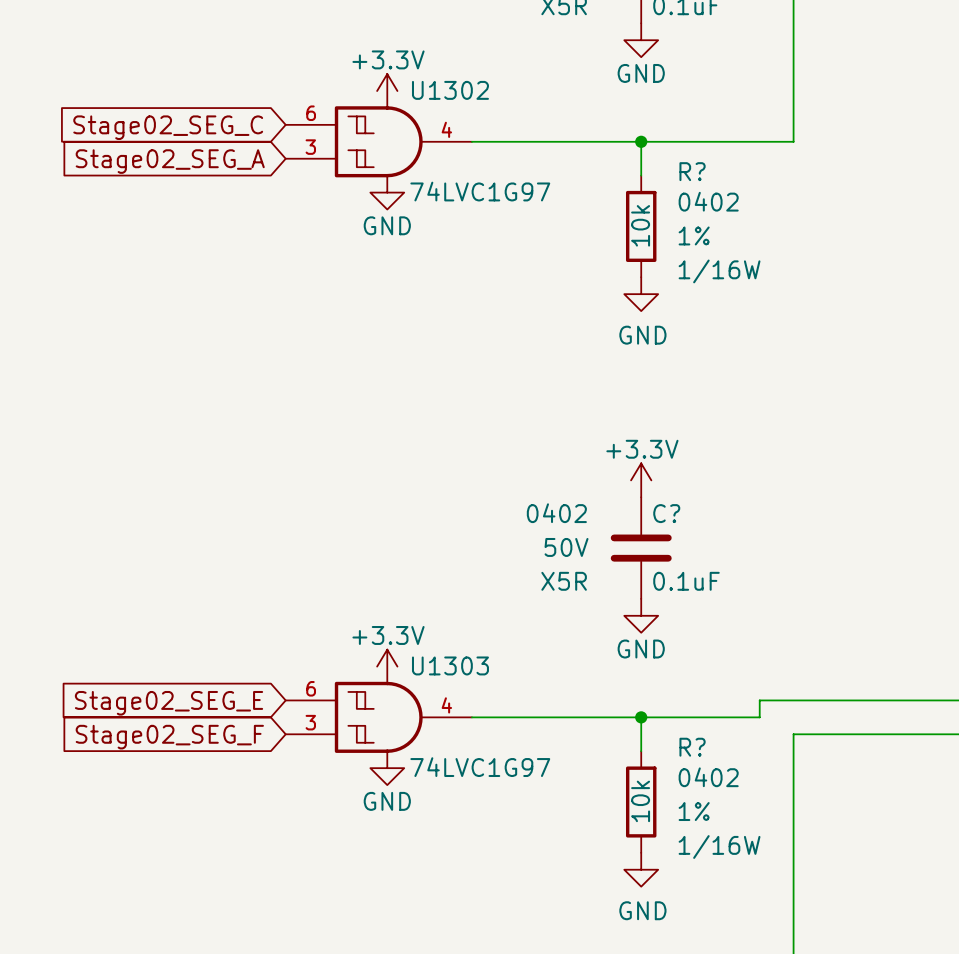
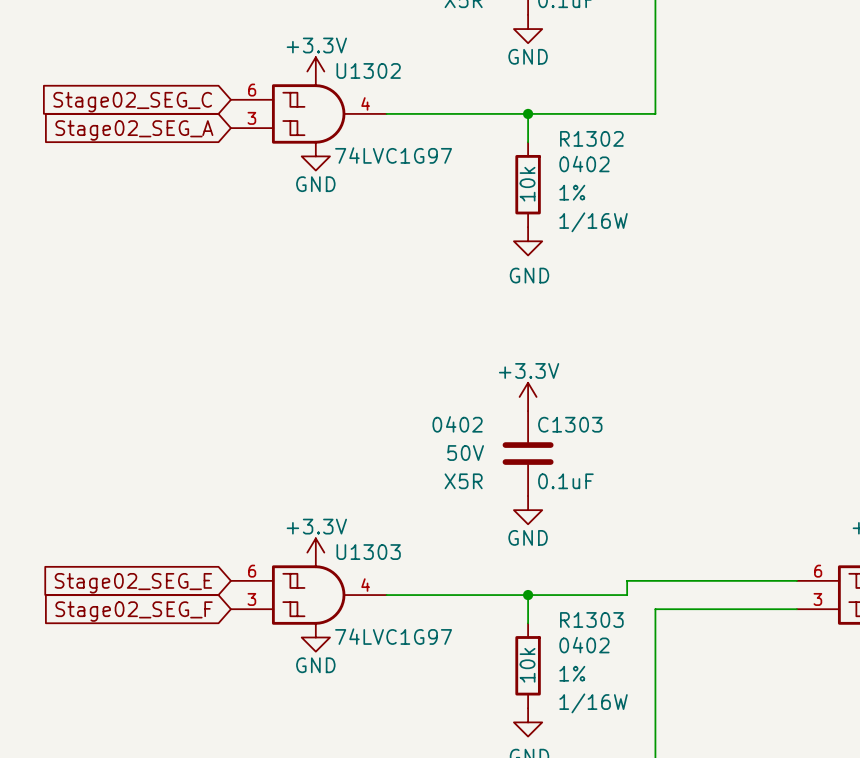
R? name: R? (692, 171) -> R1302 (591, 138)
C? name: C? (666, 513) -> C1303 (570, 424)
R? name: R? (692, 747) -> R1303 (591, 619)

